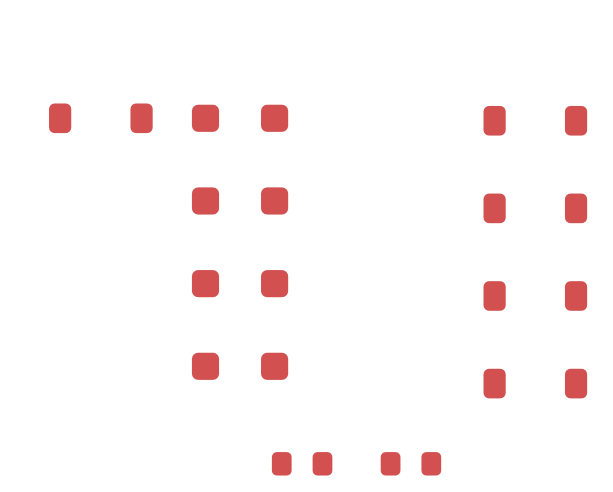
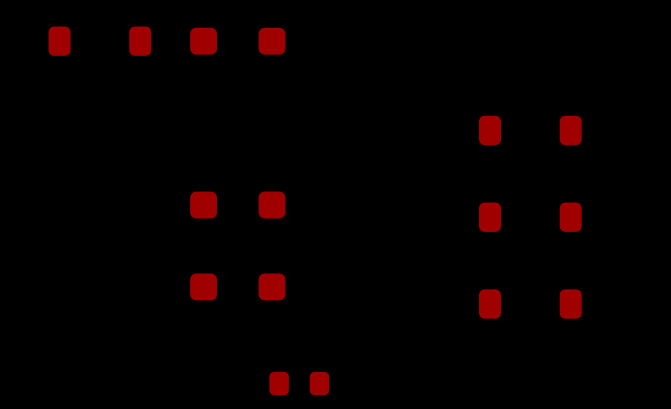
part: (535, 120) -> none
part: (240, 200) -> none
part: (410, 463) -> none

